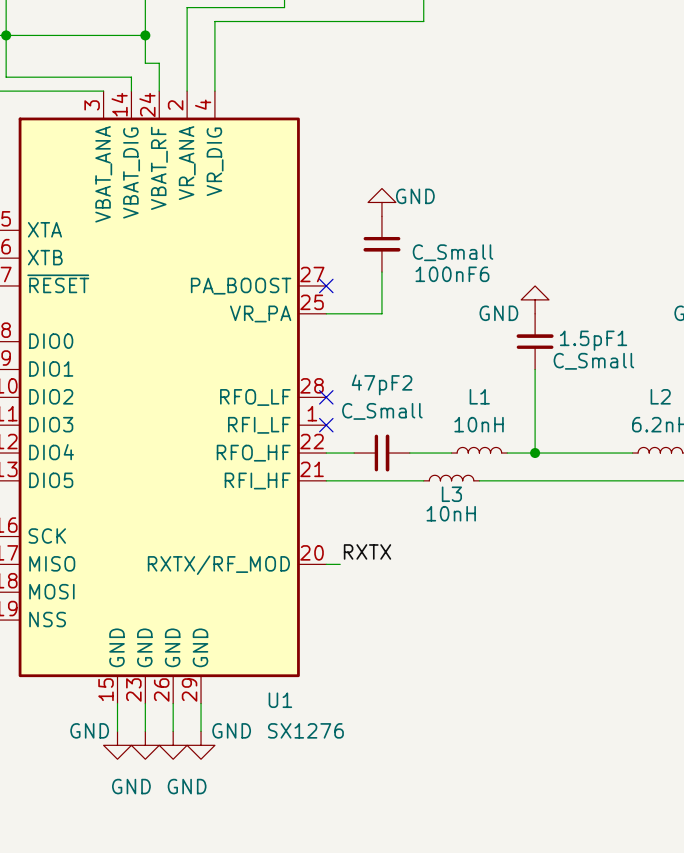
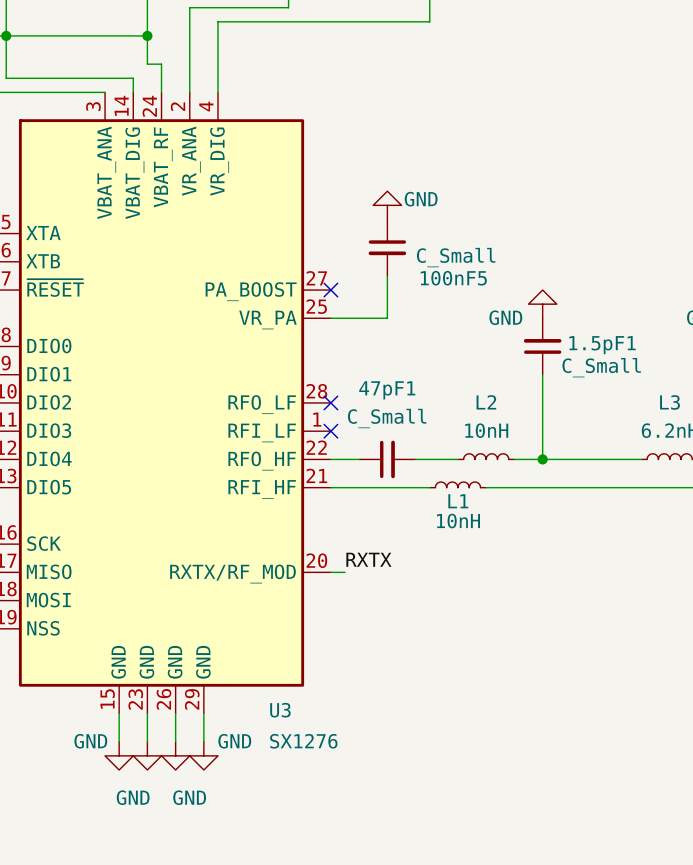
100nF6 name: 100nF6 (452, 274) -> 100nF5 (453, 278)
47pF2 name: 47pF2 (382, 384) -> 47pF1 (387, 390)
L1 name: L1 (479, 396) -> L2 (486, 402)
L2 name: L2 (660, 396) -> L3 (670, 402)
L3 name: L3 (451, 494) -> L1 (458, 501)
U1 name: U1 (280, 700) -> U3 (280, 710)

